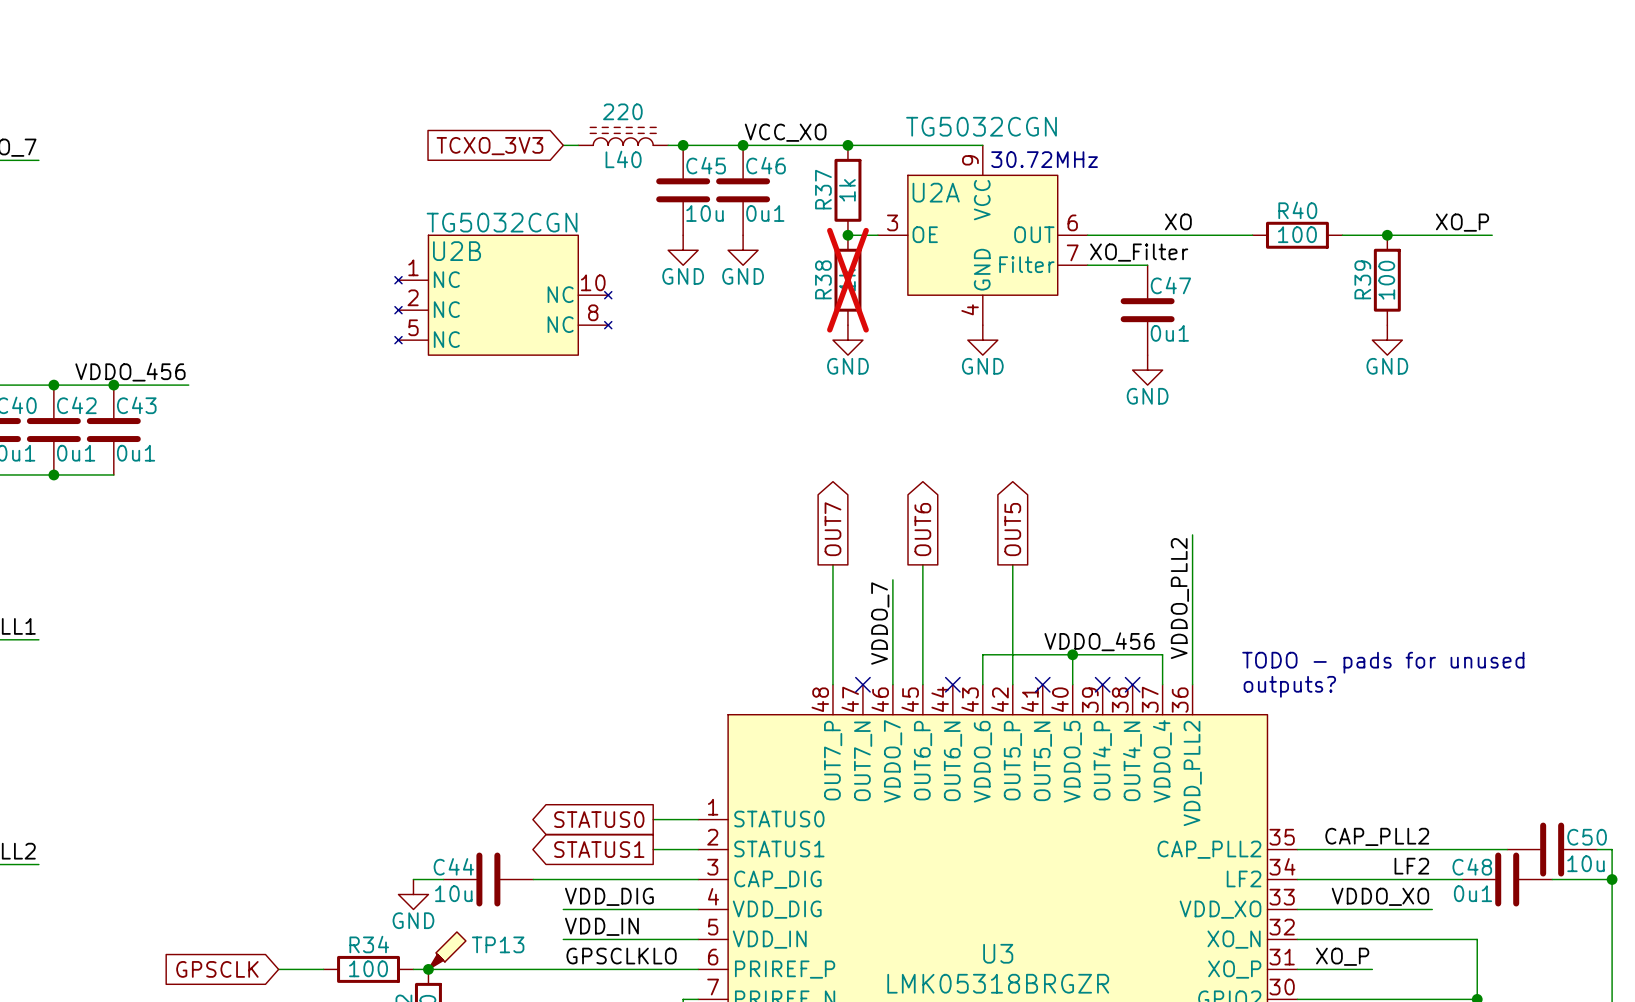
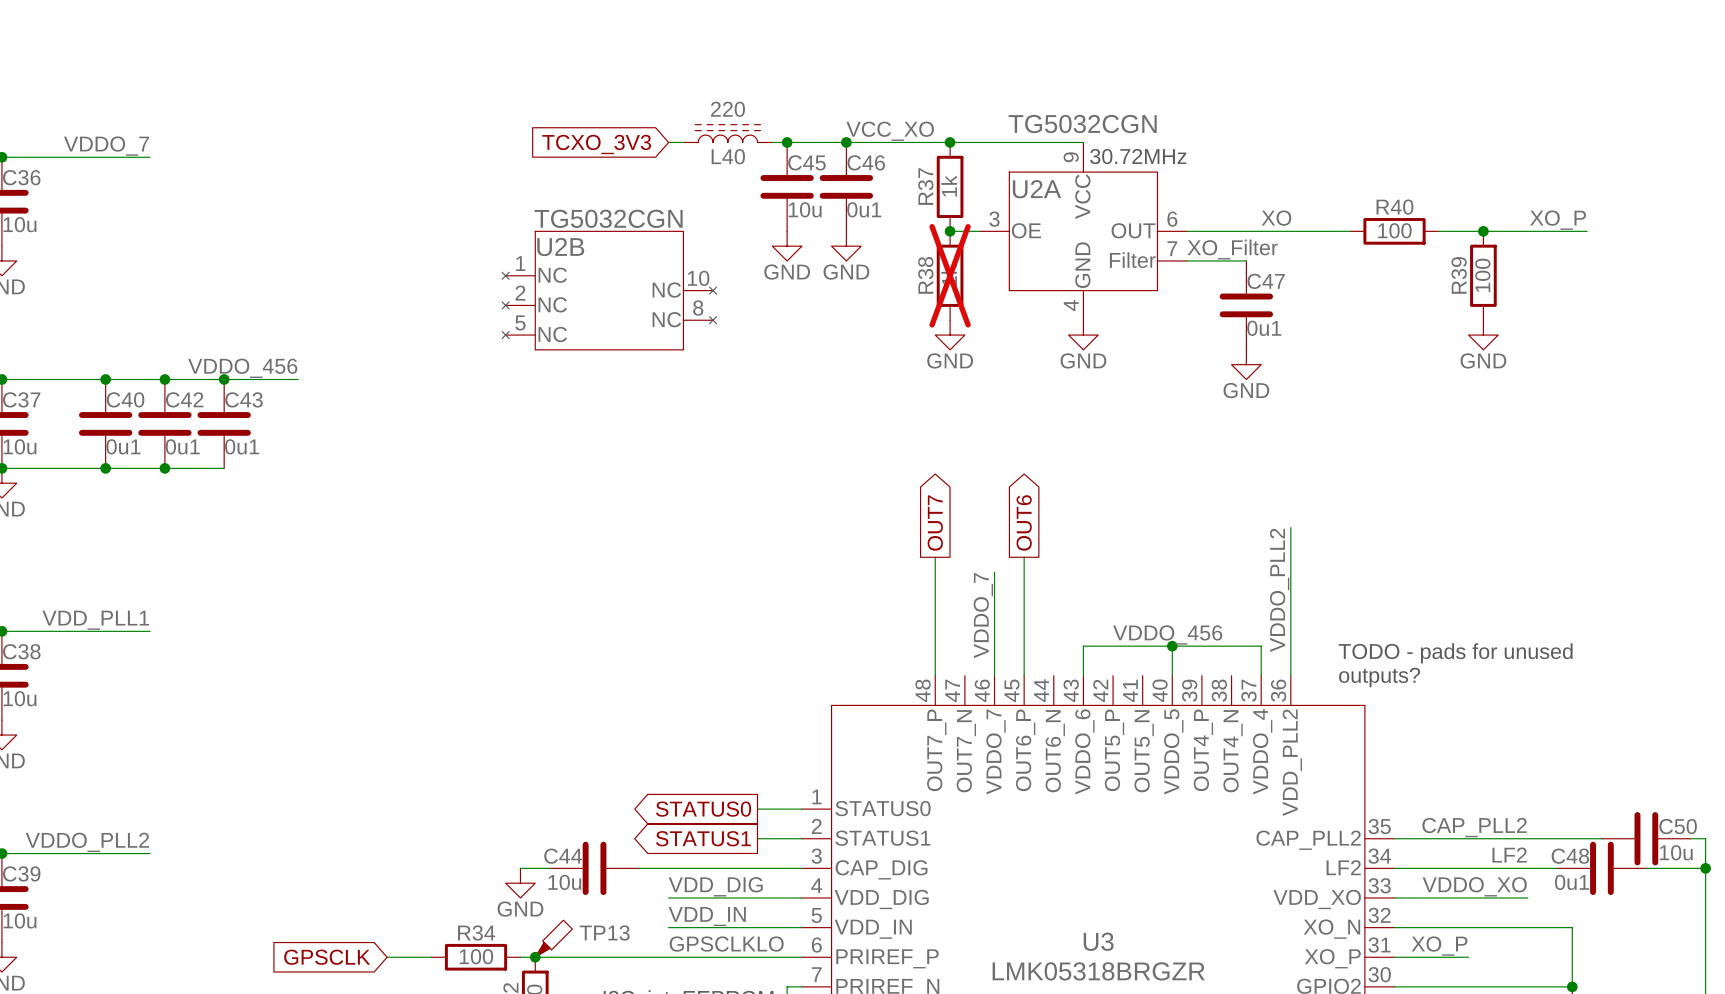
global label: OUT5 (1012, 529) -> none
wire: (1012, 564) (1012, 684) -> none
label position: VDDO_456 (1099, 641) -> VDDO_456 (1167, 634)
no-connect mark: (862, 684) -> none
no-connect mark: (952, 684) -> none
no-connect mark: (1042, 684) -> none
no-connect mark: (1102, 684) -> none
no-connect mark: (1132, 684) -> none

